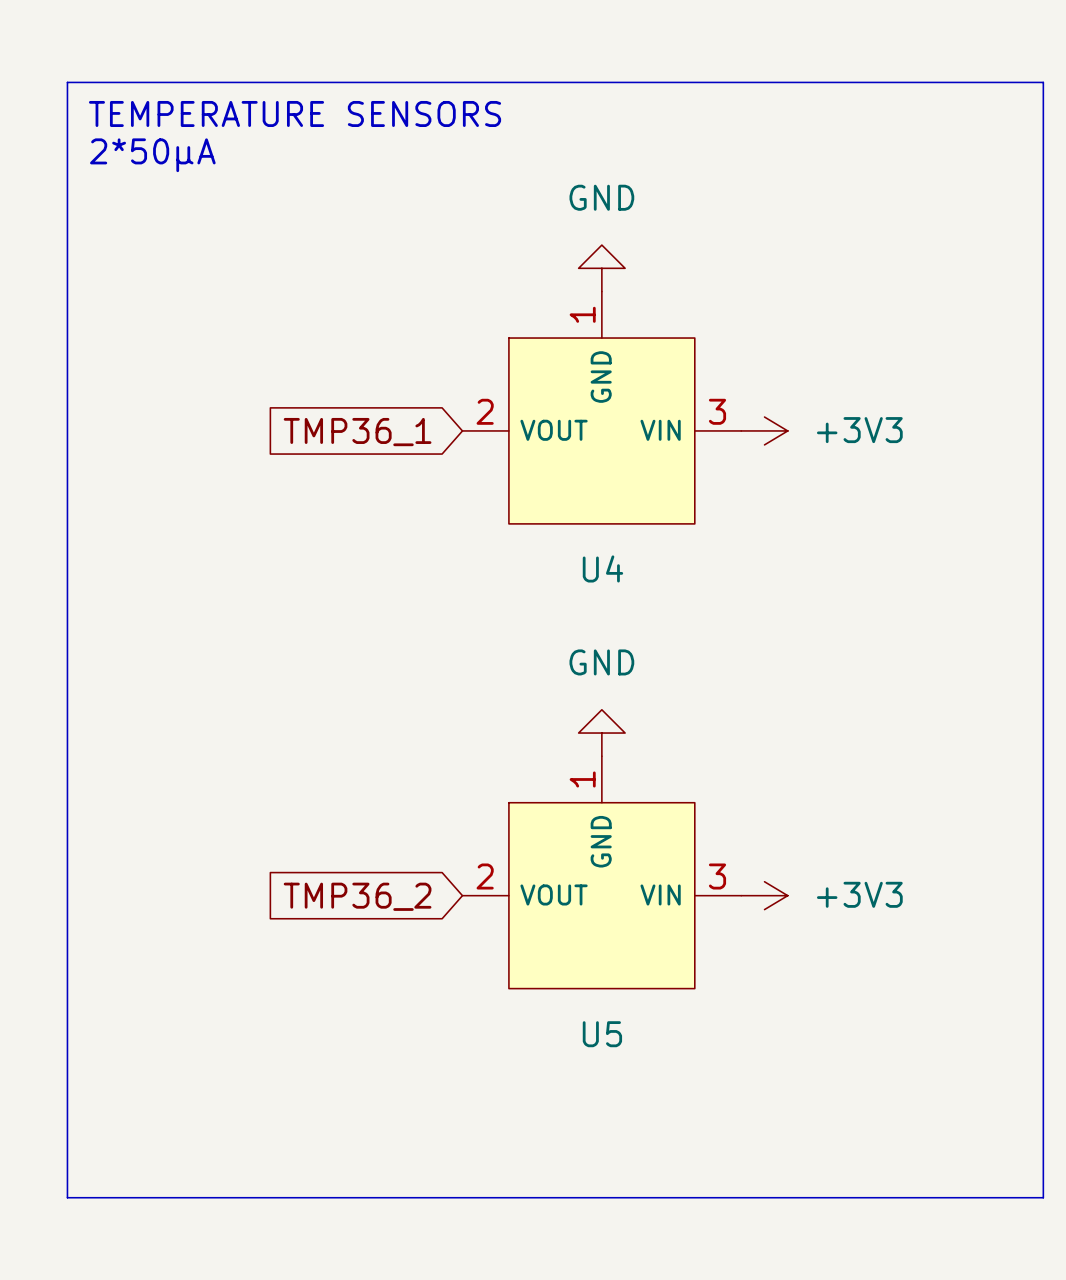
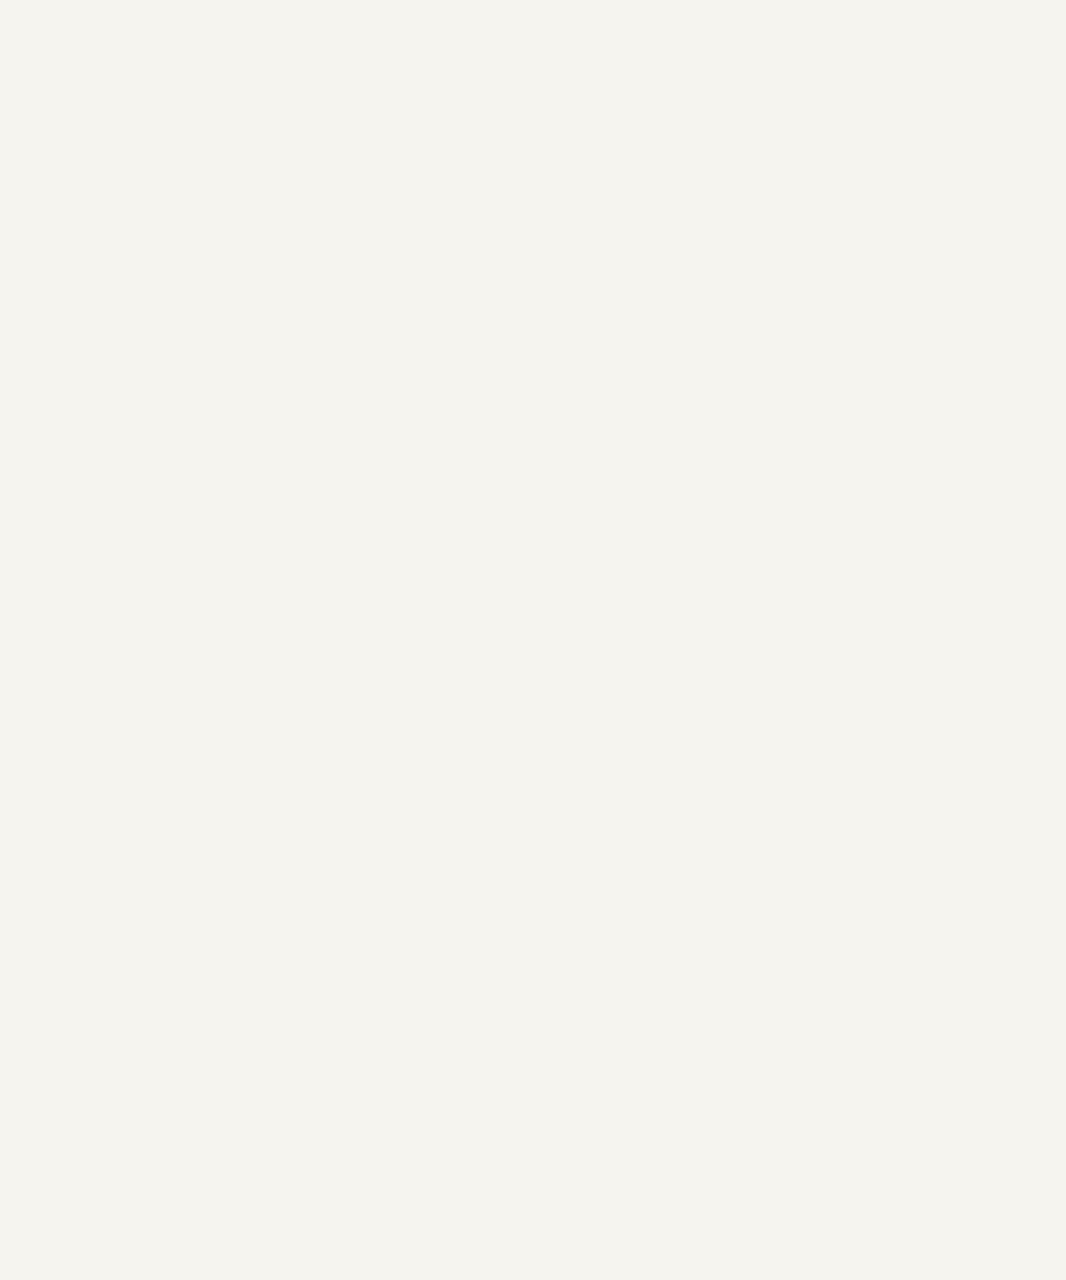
line: (67, 82) (1043, 82) (1043, 1197) (67, 1197) (67, 82) -> none
text: TEMPERATURE SENSORS (295, 113) -> none
text: 2*50µA (152, 155) -> none
power symbol: GND (601, 268) -> none
U4: (601, 407) -> none
power symbol: +3V3 (764, 430) -> none
global label: TMP36_1 (357, 432) -> none
power symbol: GND (601, 733) -> none
U5: (601, 872) -> none
power symbol: +3V3 (764, 895) -> none
global label: TMP36_2 (357, 896) -> none

